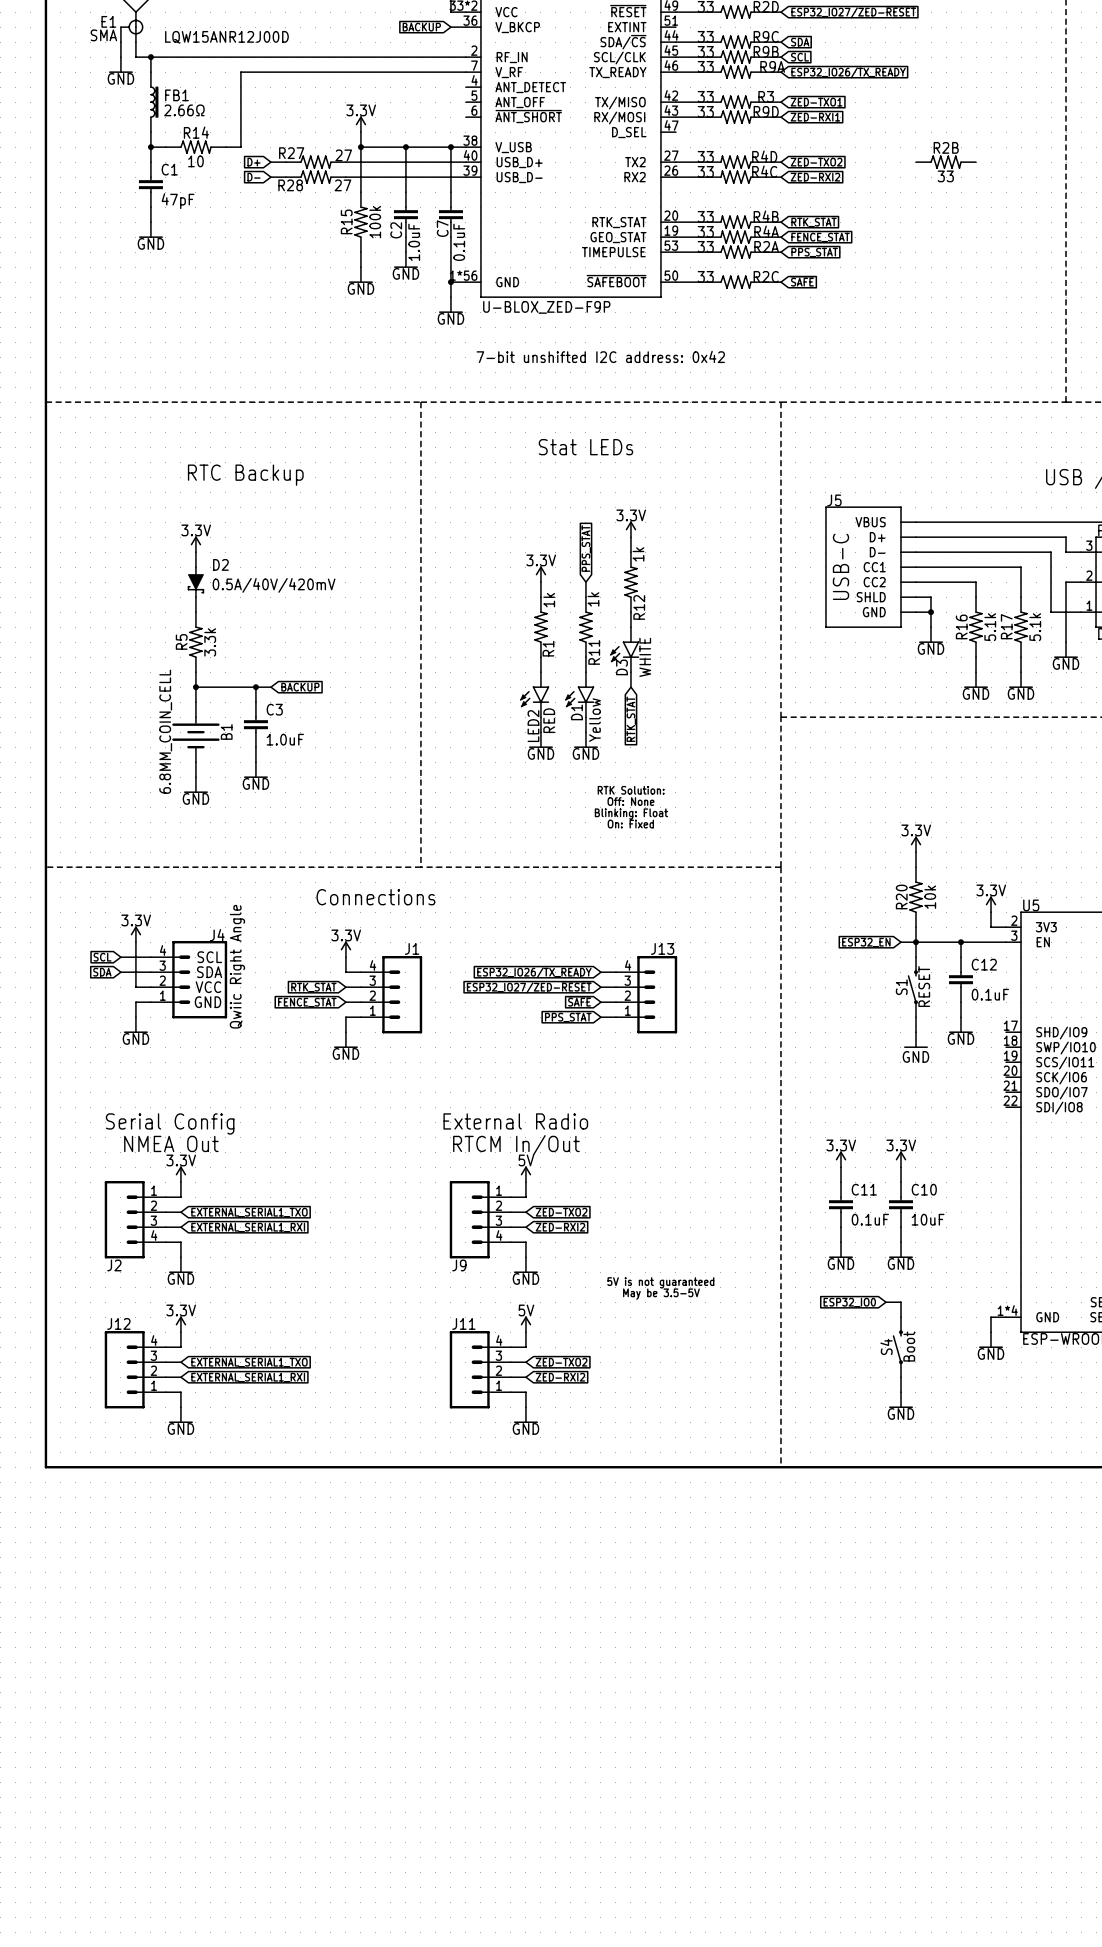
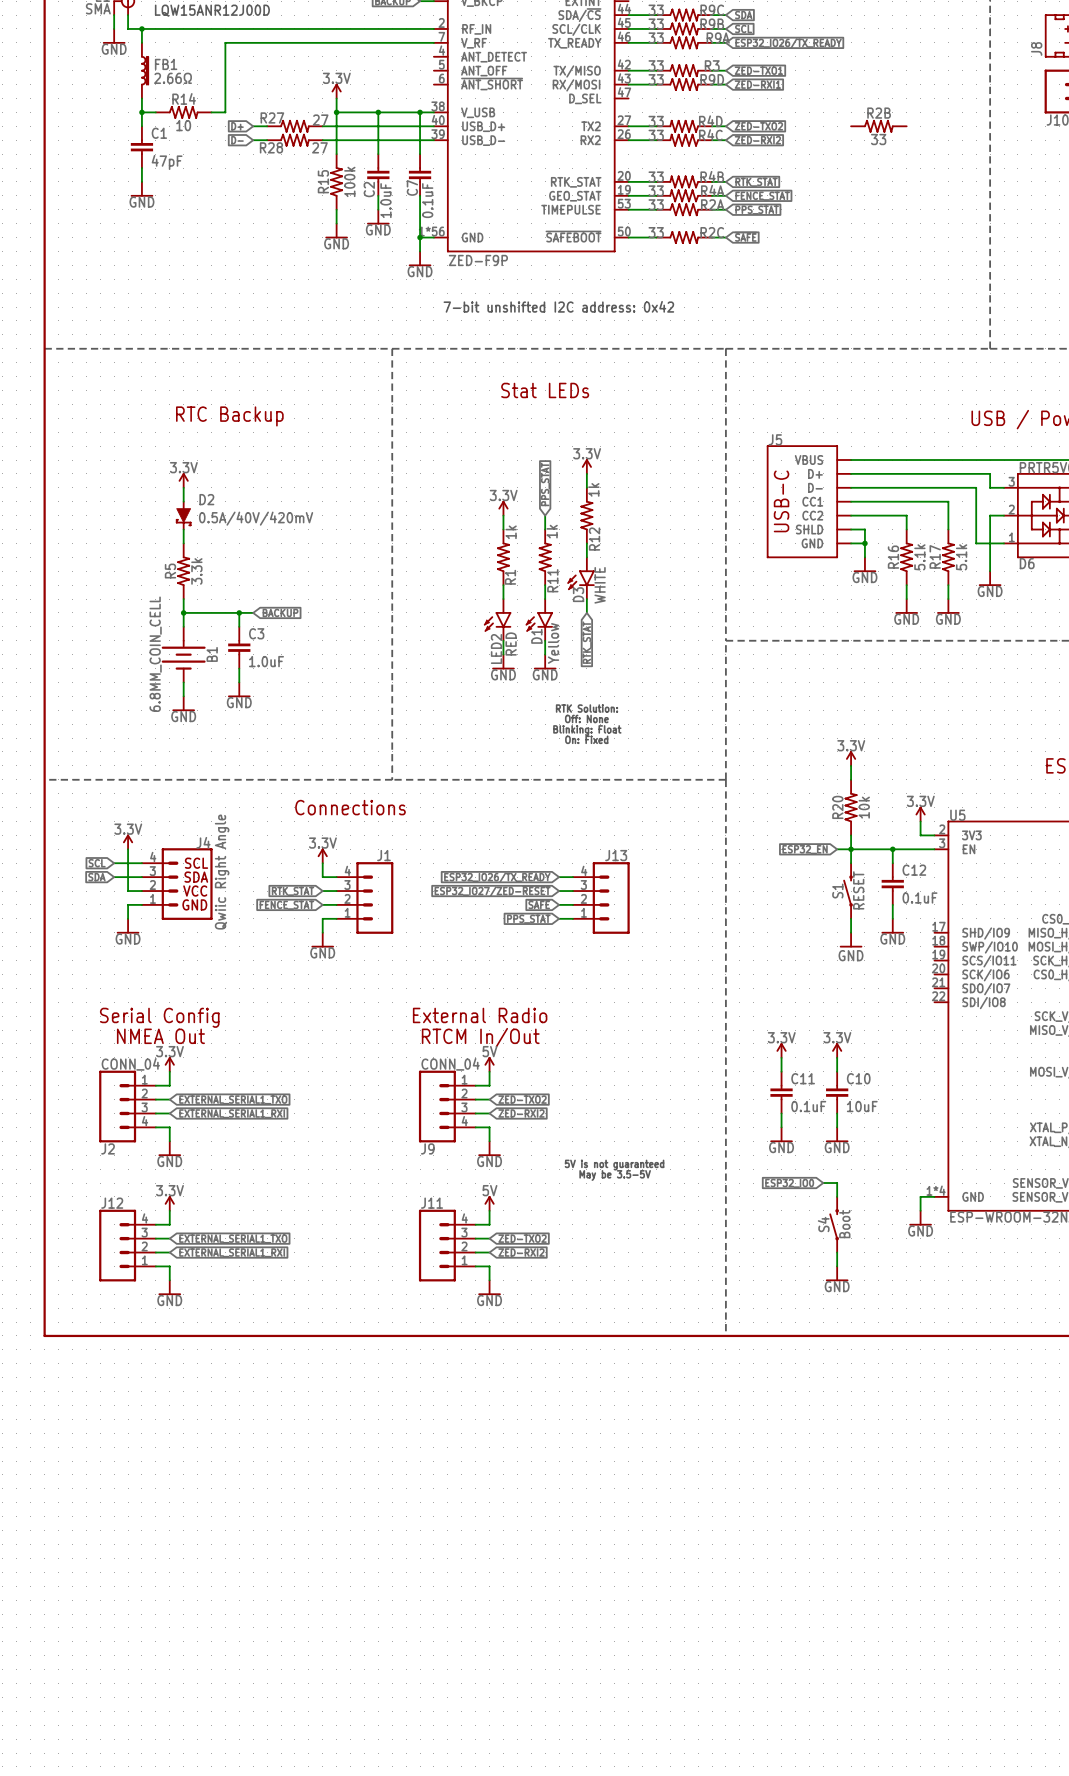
part value: U-BLOX_ZED-F9P (546, 307) -> ZED-F9P (478, 260)
J2 value: none -> CONN_04 (130, 1064)
J9 value: none -> CONN_04 (450, 1064)

